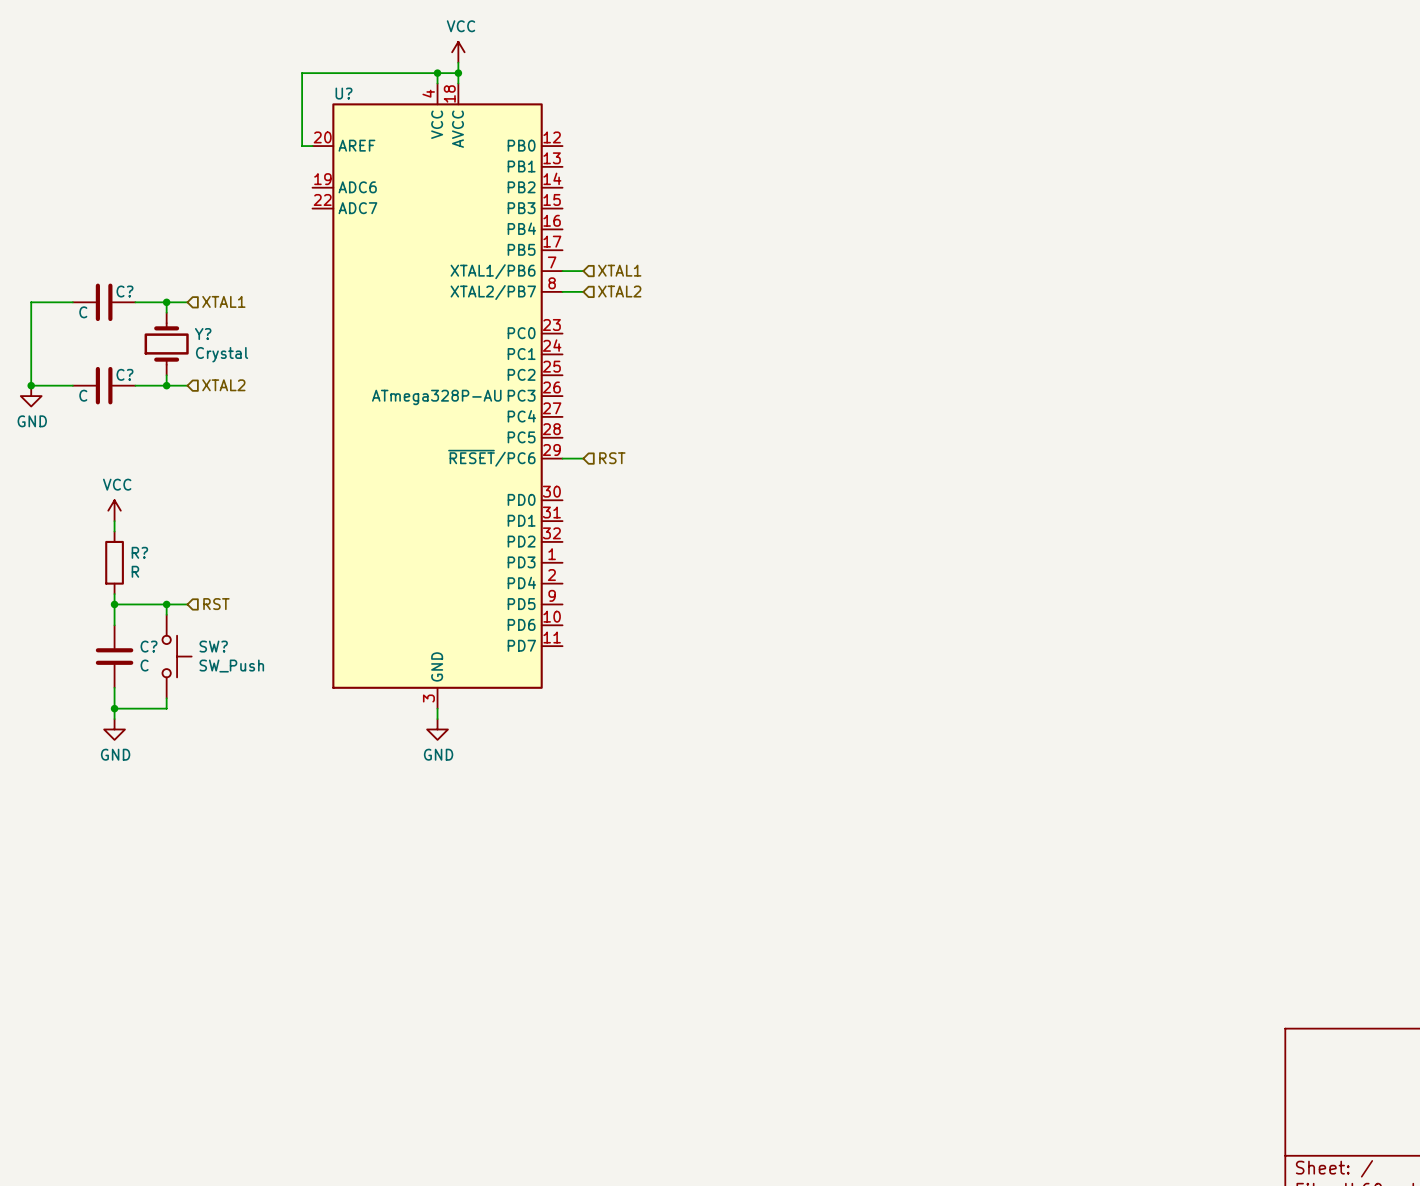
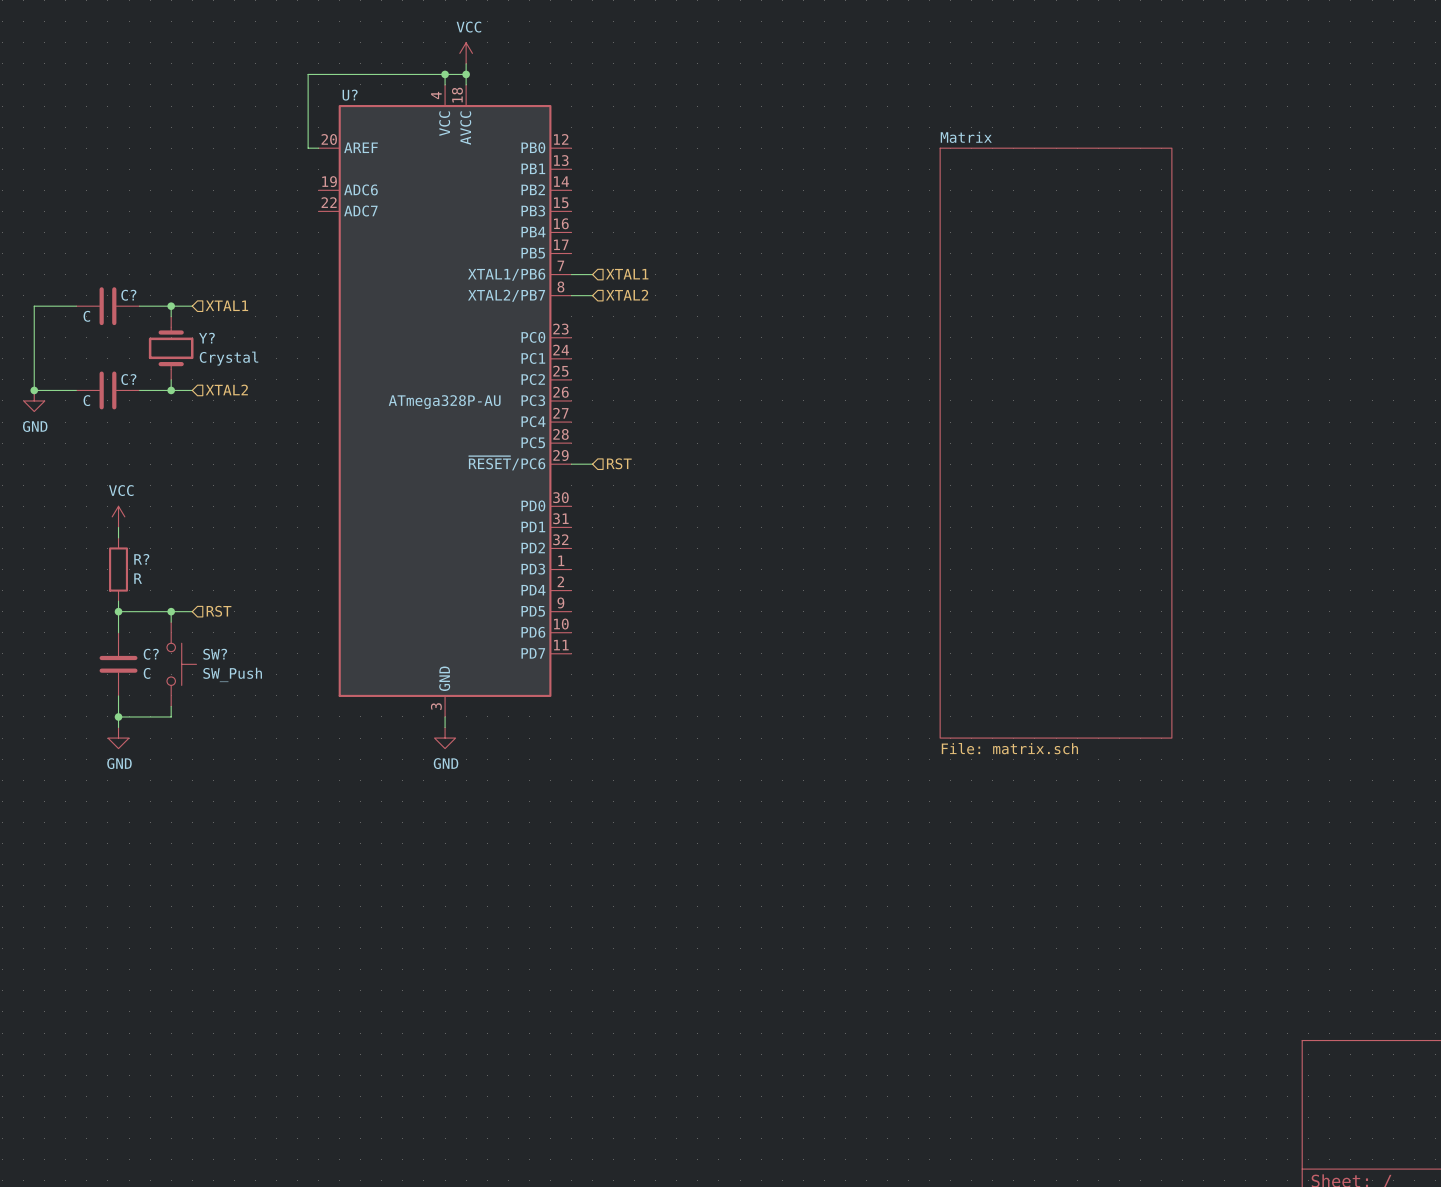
sheet Matrix: none -> File: matrix.sch (1056, 443)

